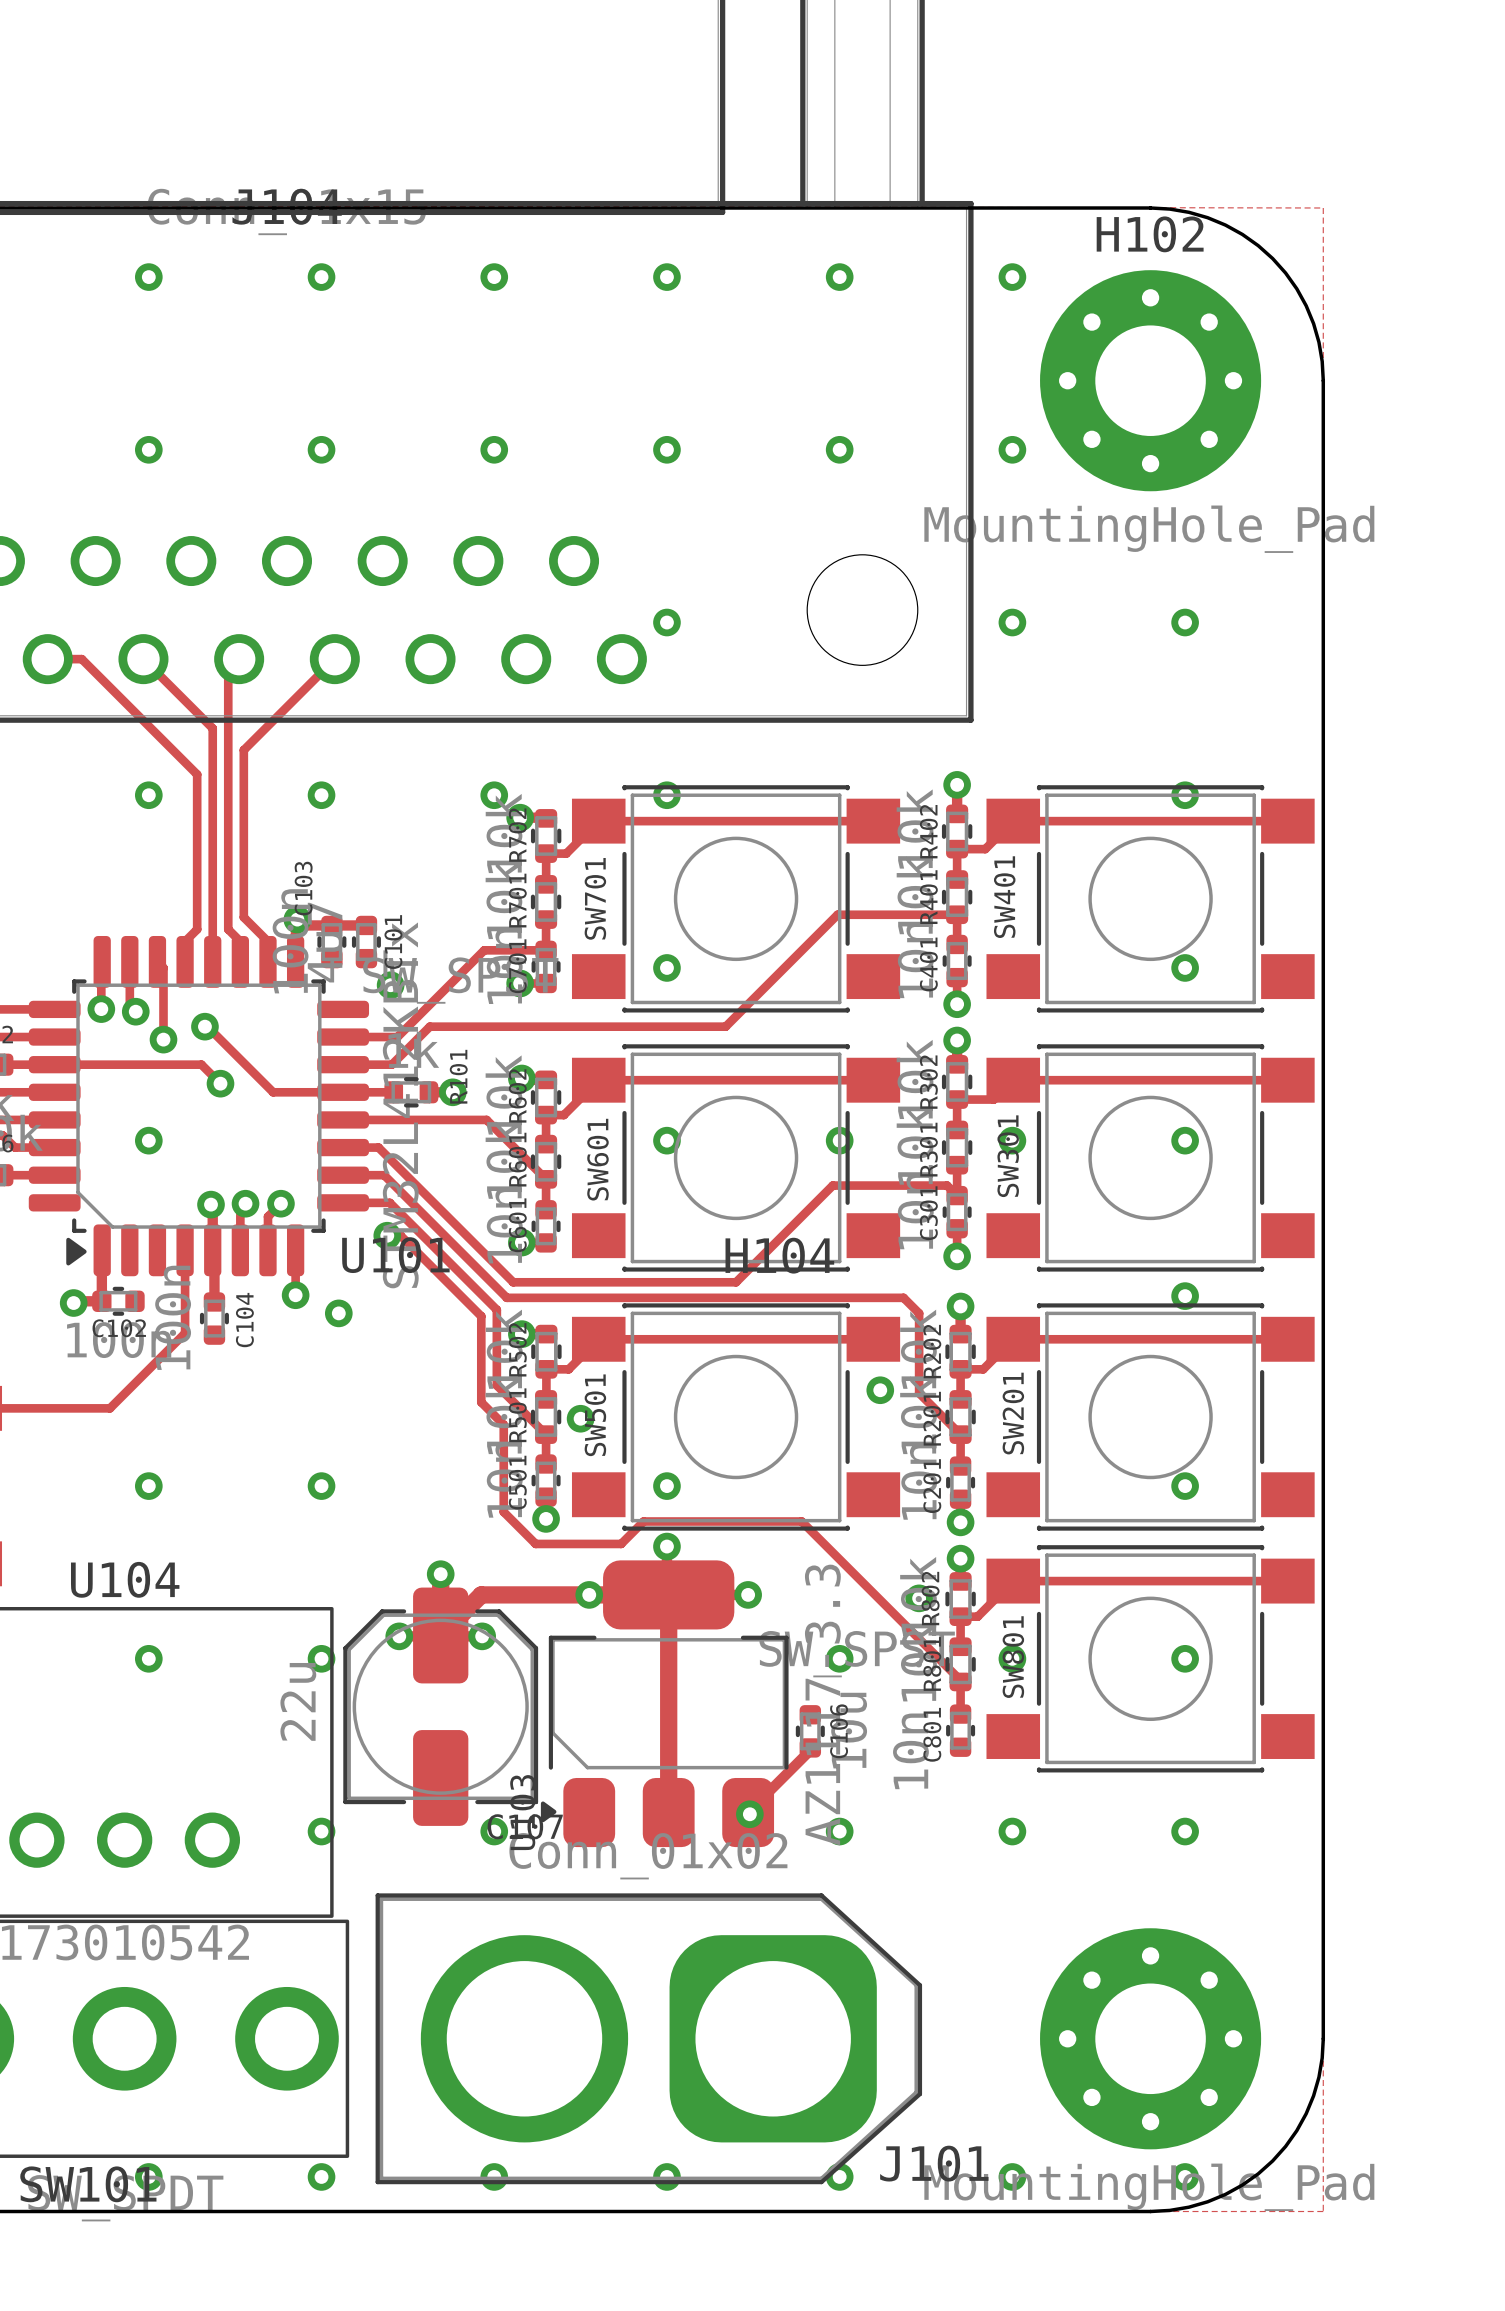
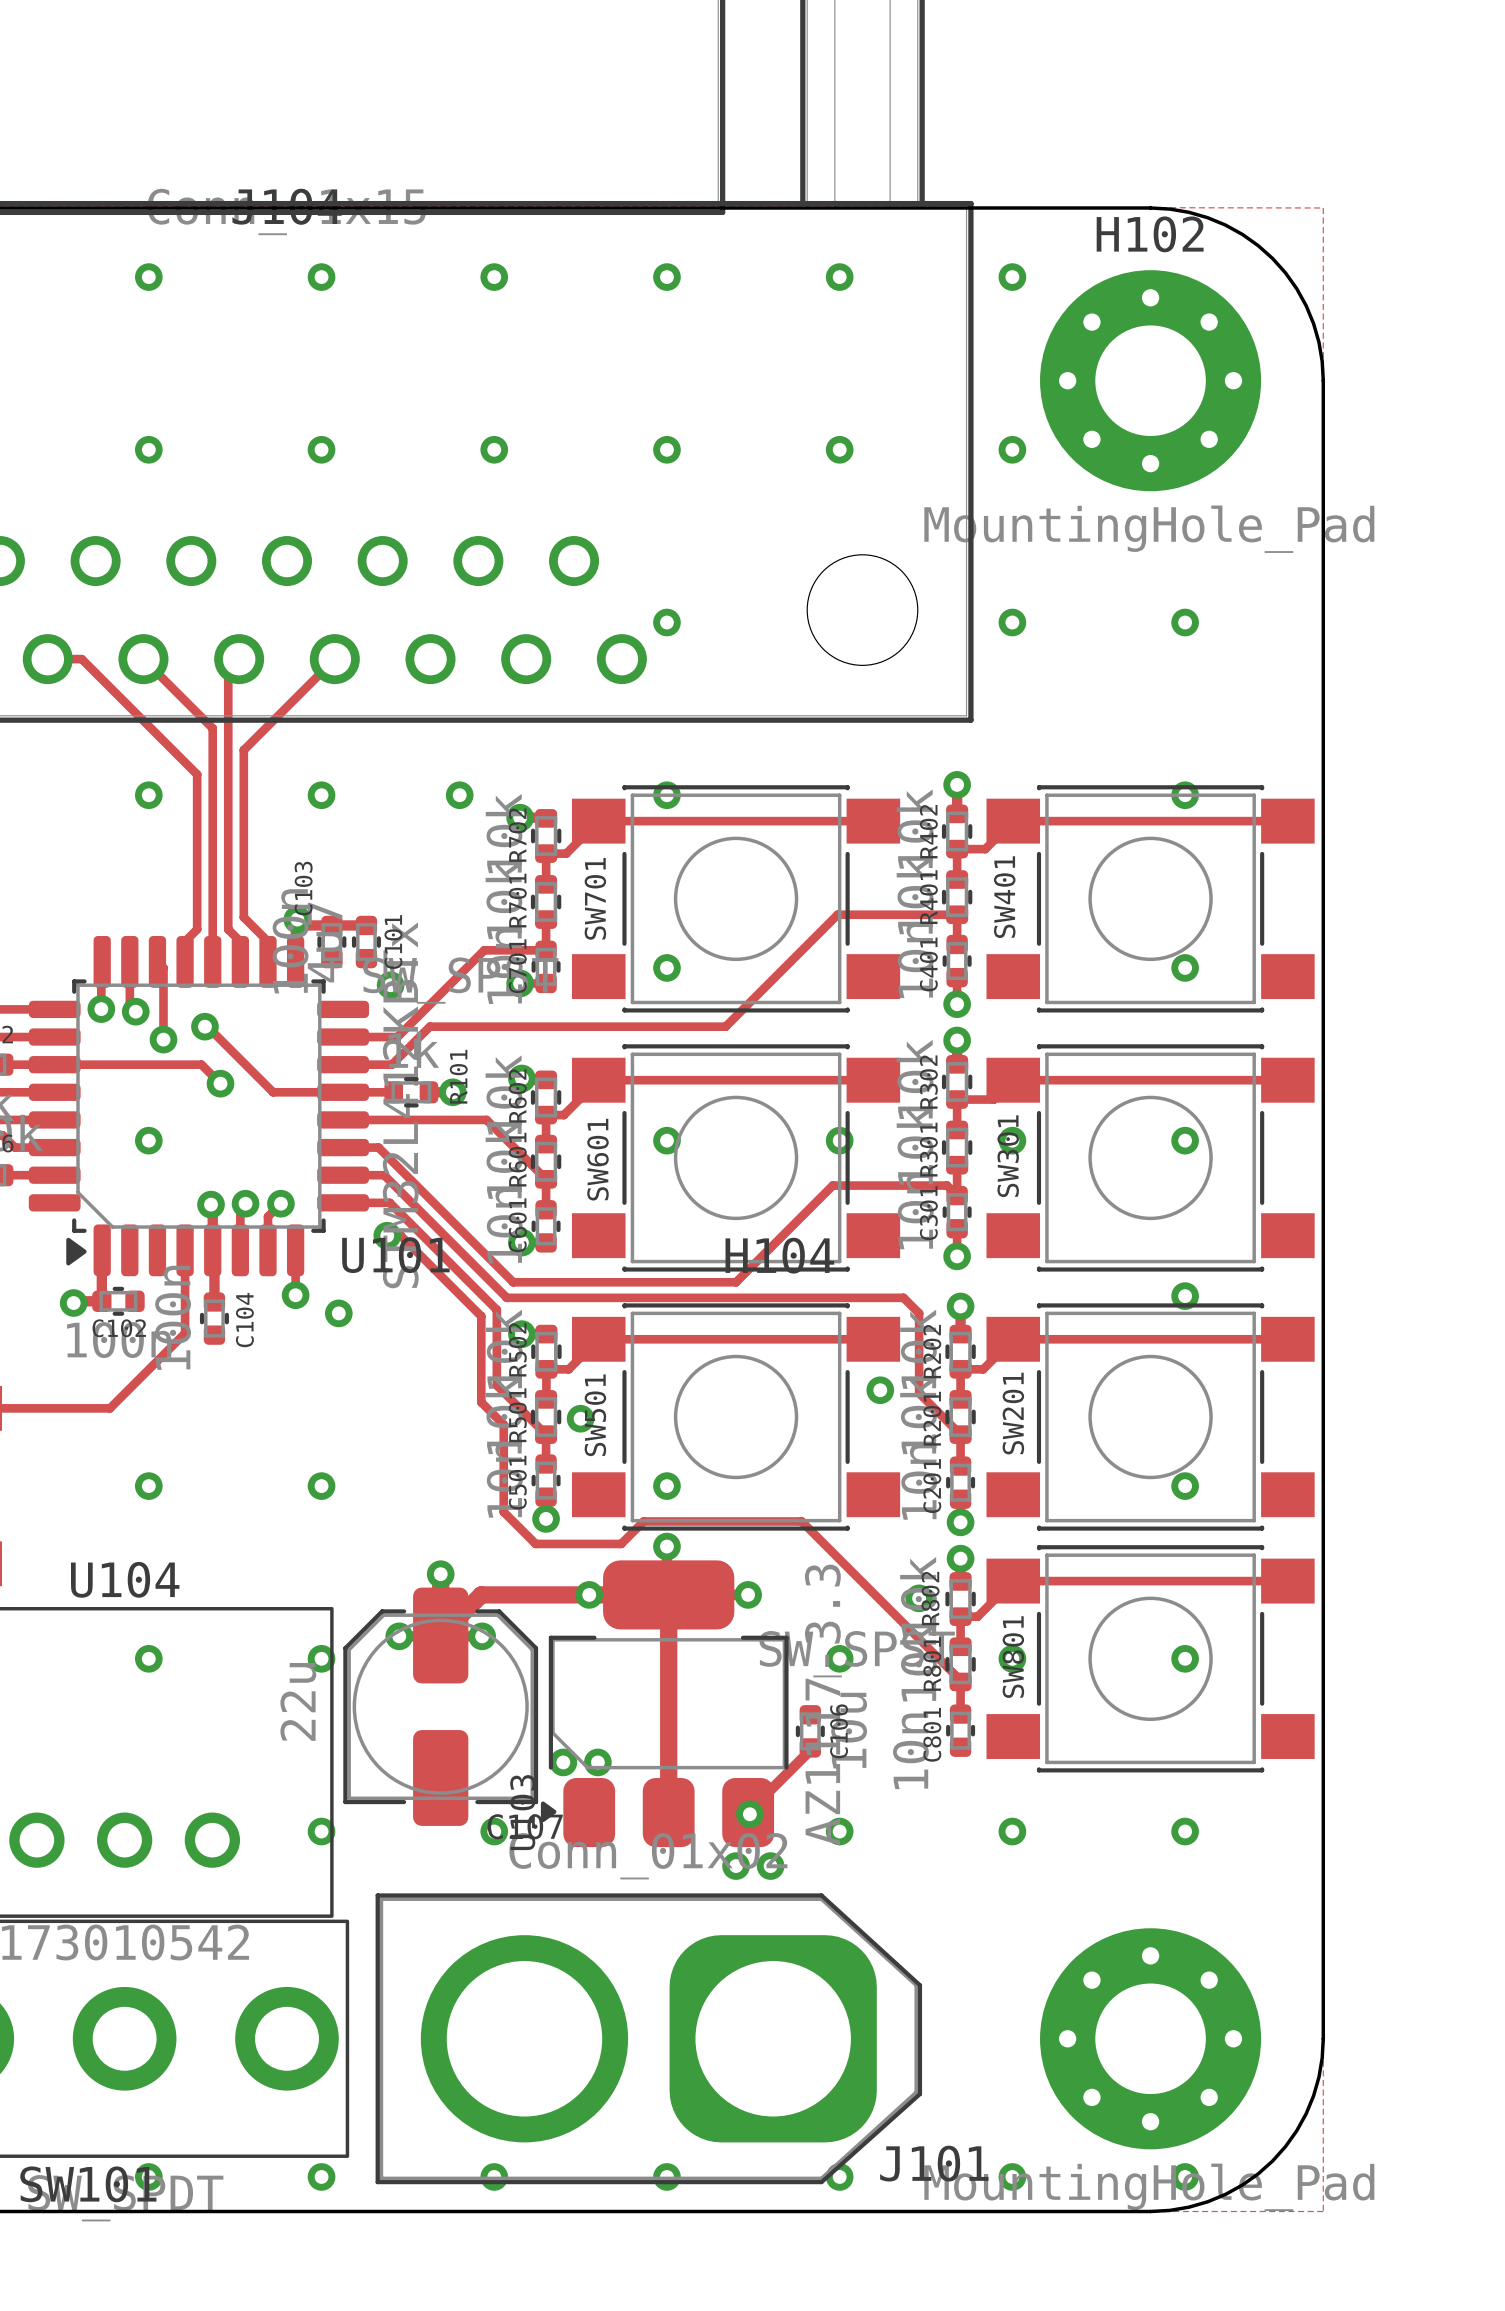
via position: (494, 795) -> (459, 795)
via: none -> (563, 1762)
via: none -> (597, 1762)
via: none -> (736, 1866)
via: none -> (770, 1866)

